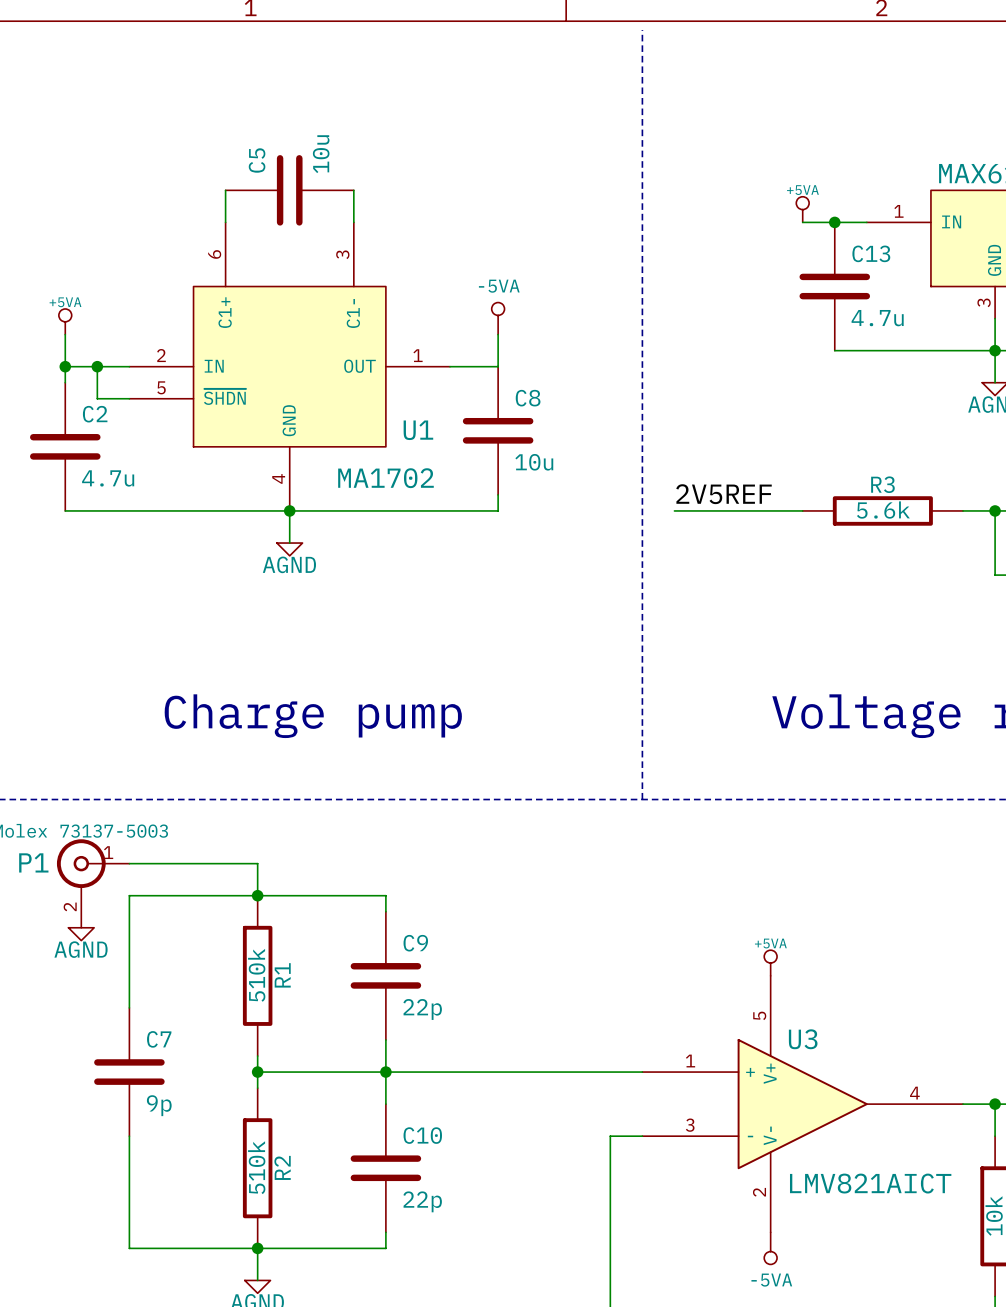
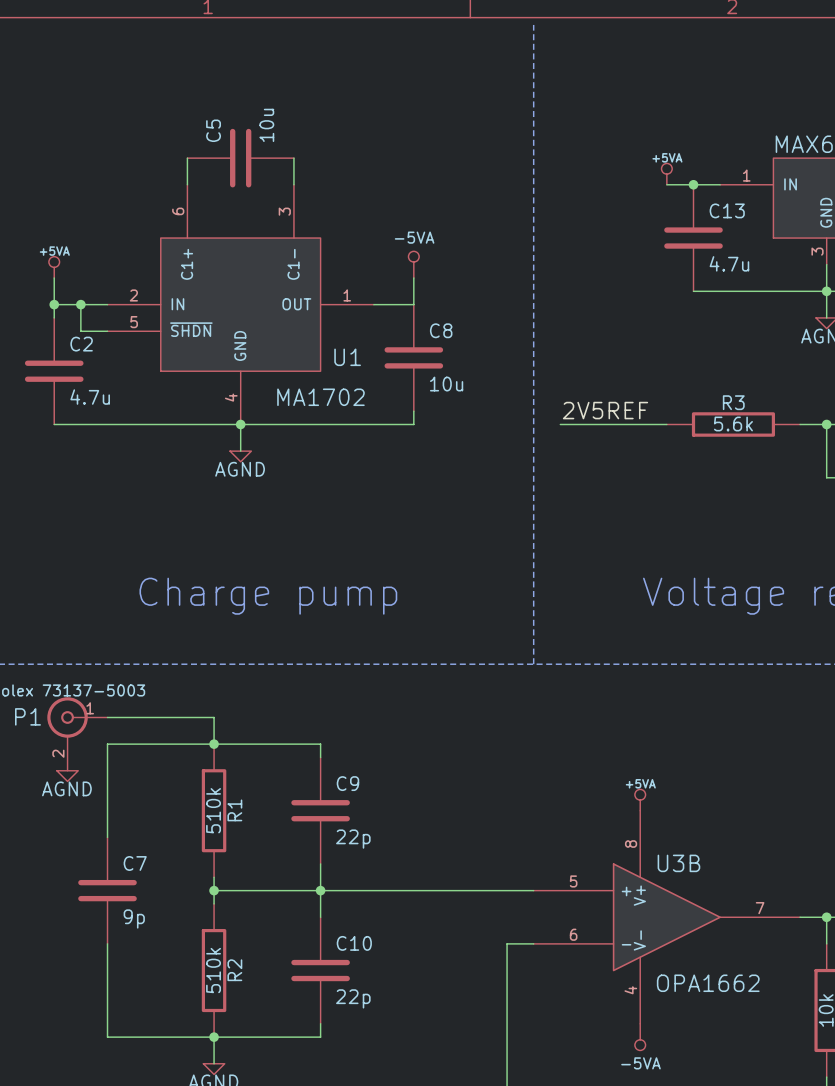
U3 pin number: 5 (759, 1015) -> 8 (631, 844)
U3 name: U3 (803, 1039) -> U3B (678, 863)
U3 pin number: 1 (690, 1061) -> 5 (573, 881)
U3 pin number: 4 (914, 1093) -> 7 (760, 908)
U3 pin number: 3 (690, 1125) -> 6 (573, 934)
U3 value: LMV821AICT (870, 1183) -> OPA1662 (708, 983)
U3 pin number: 2 (759, 1192) -> 4 (630, 990)

